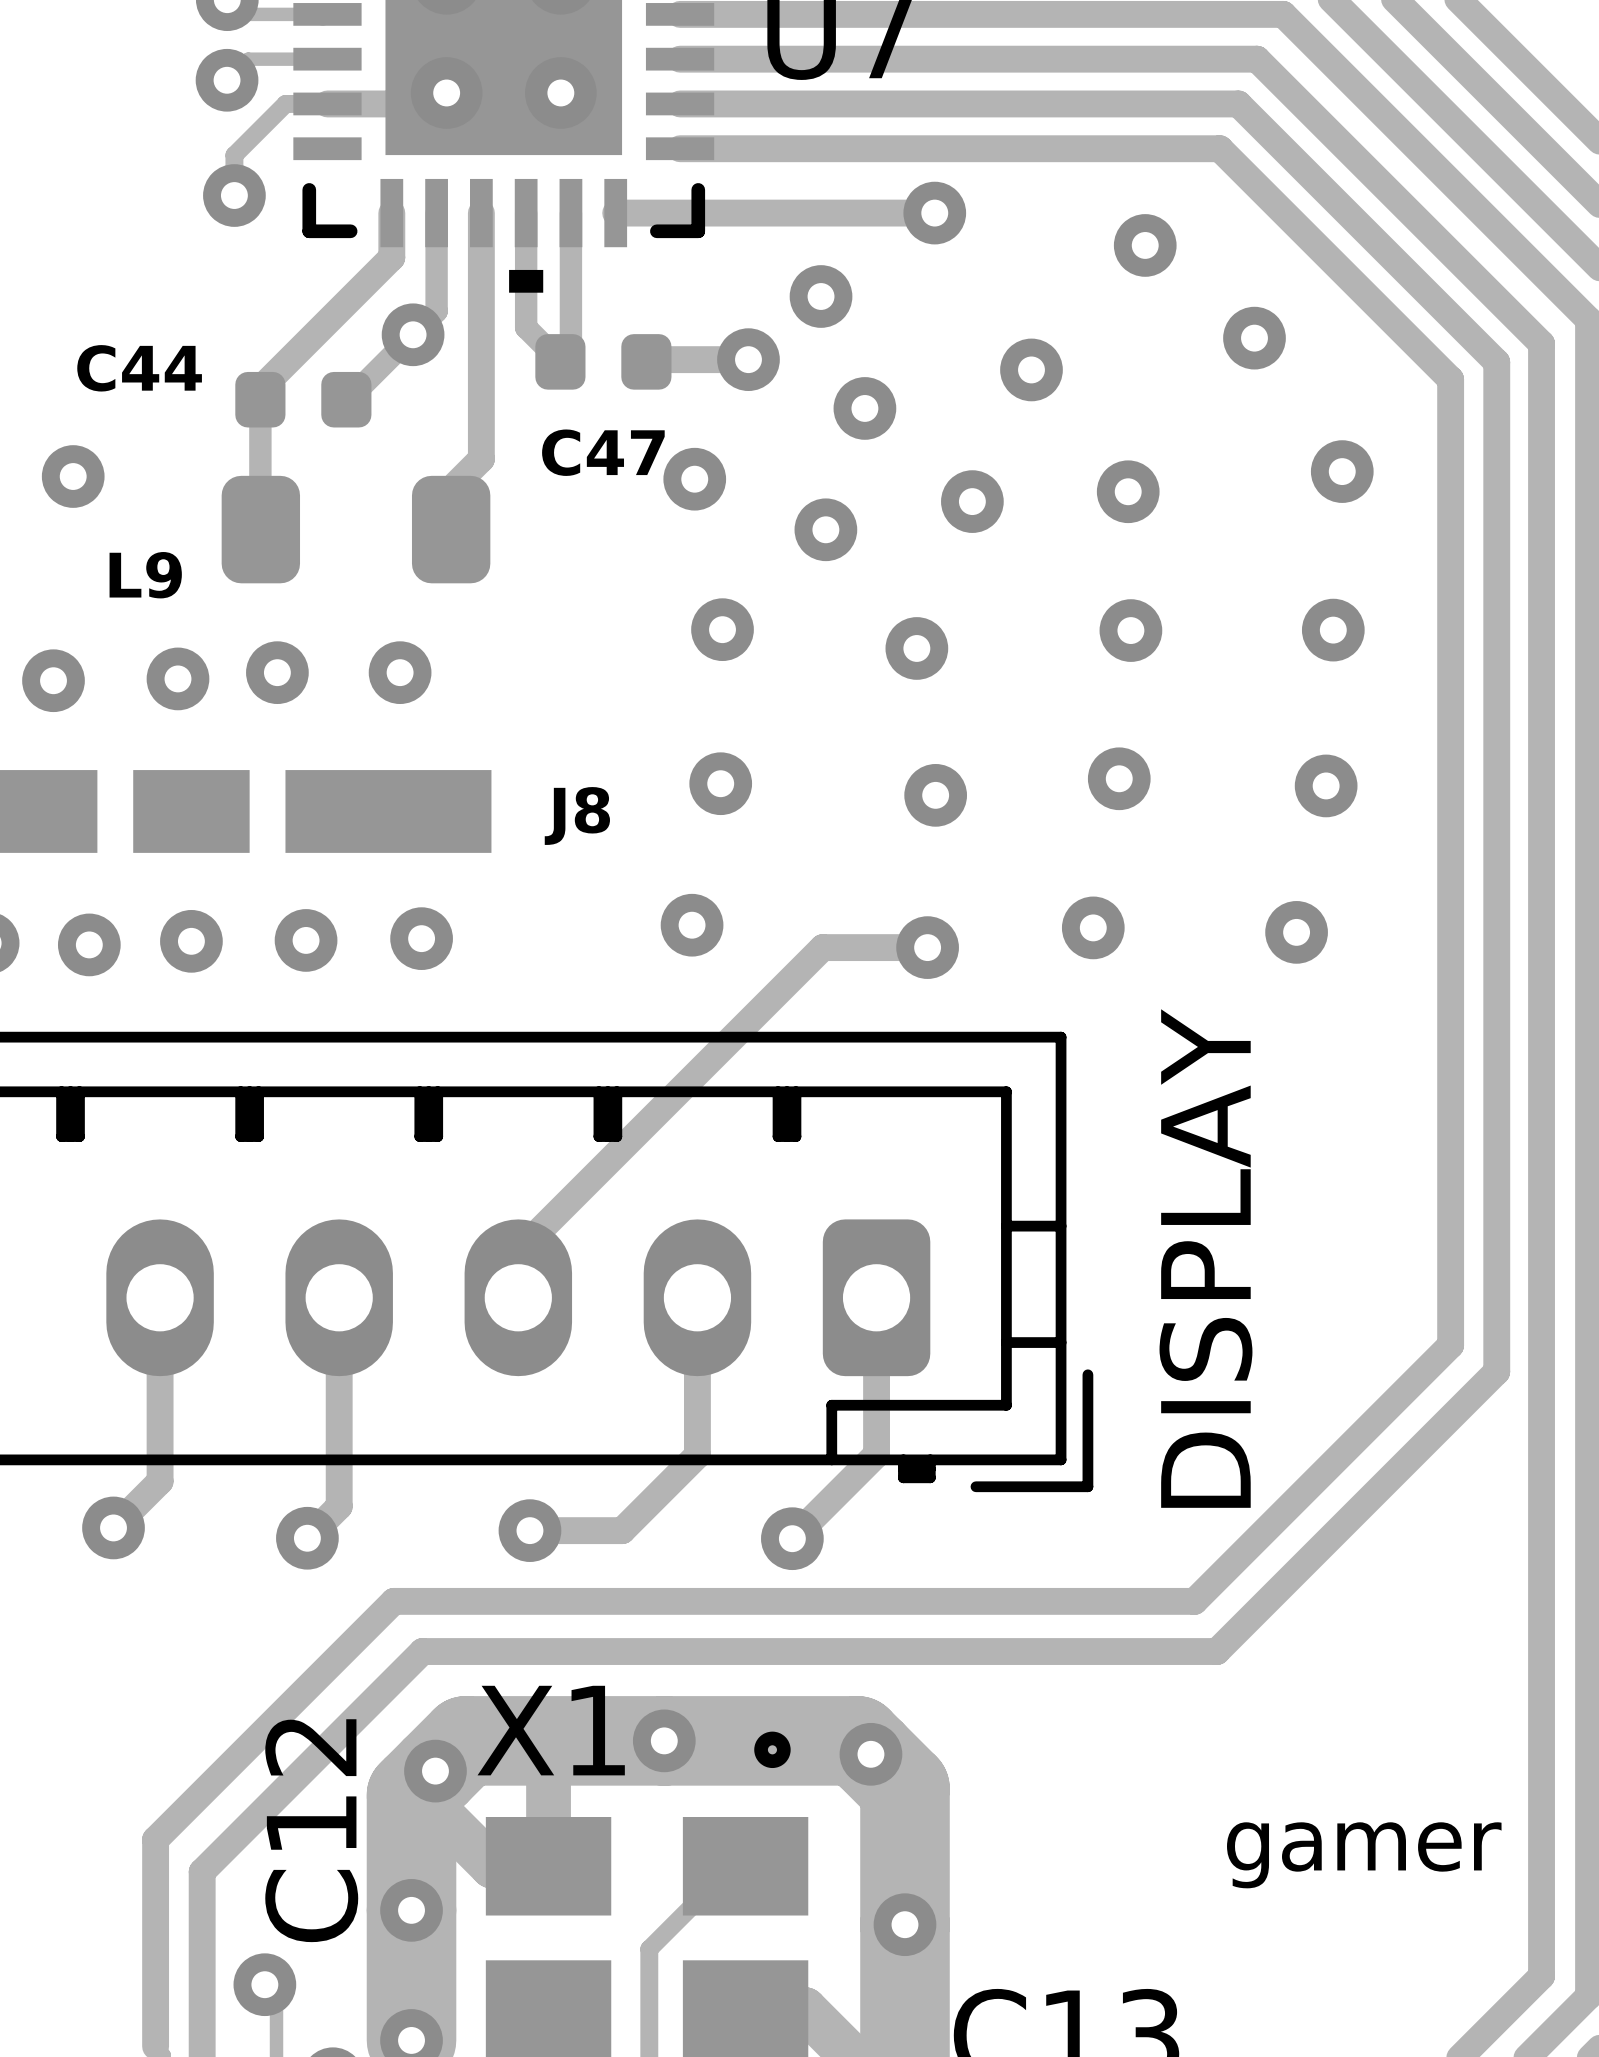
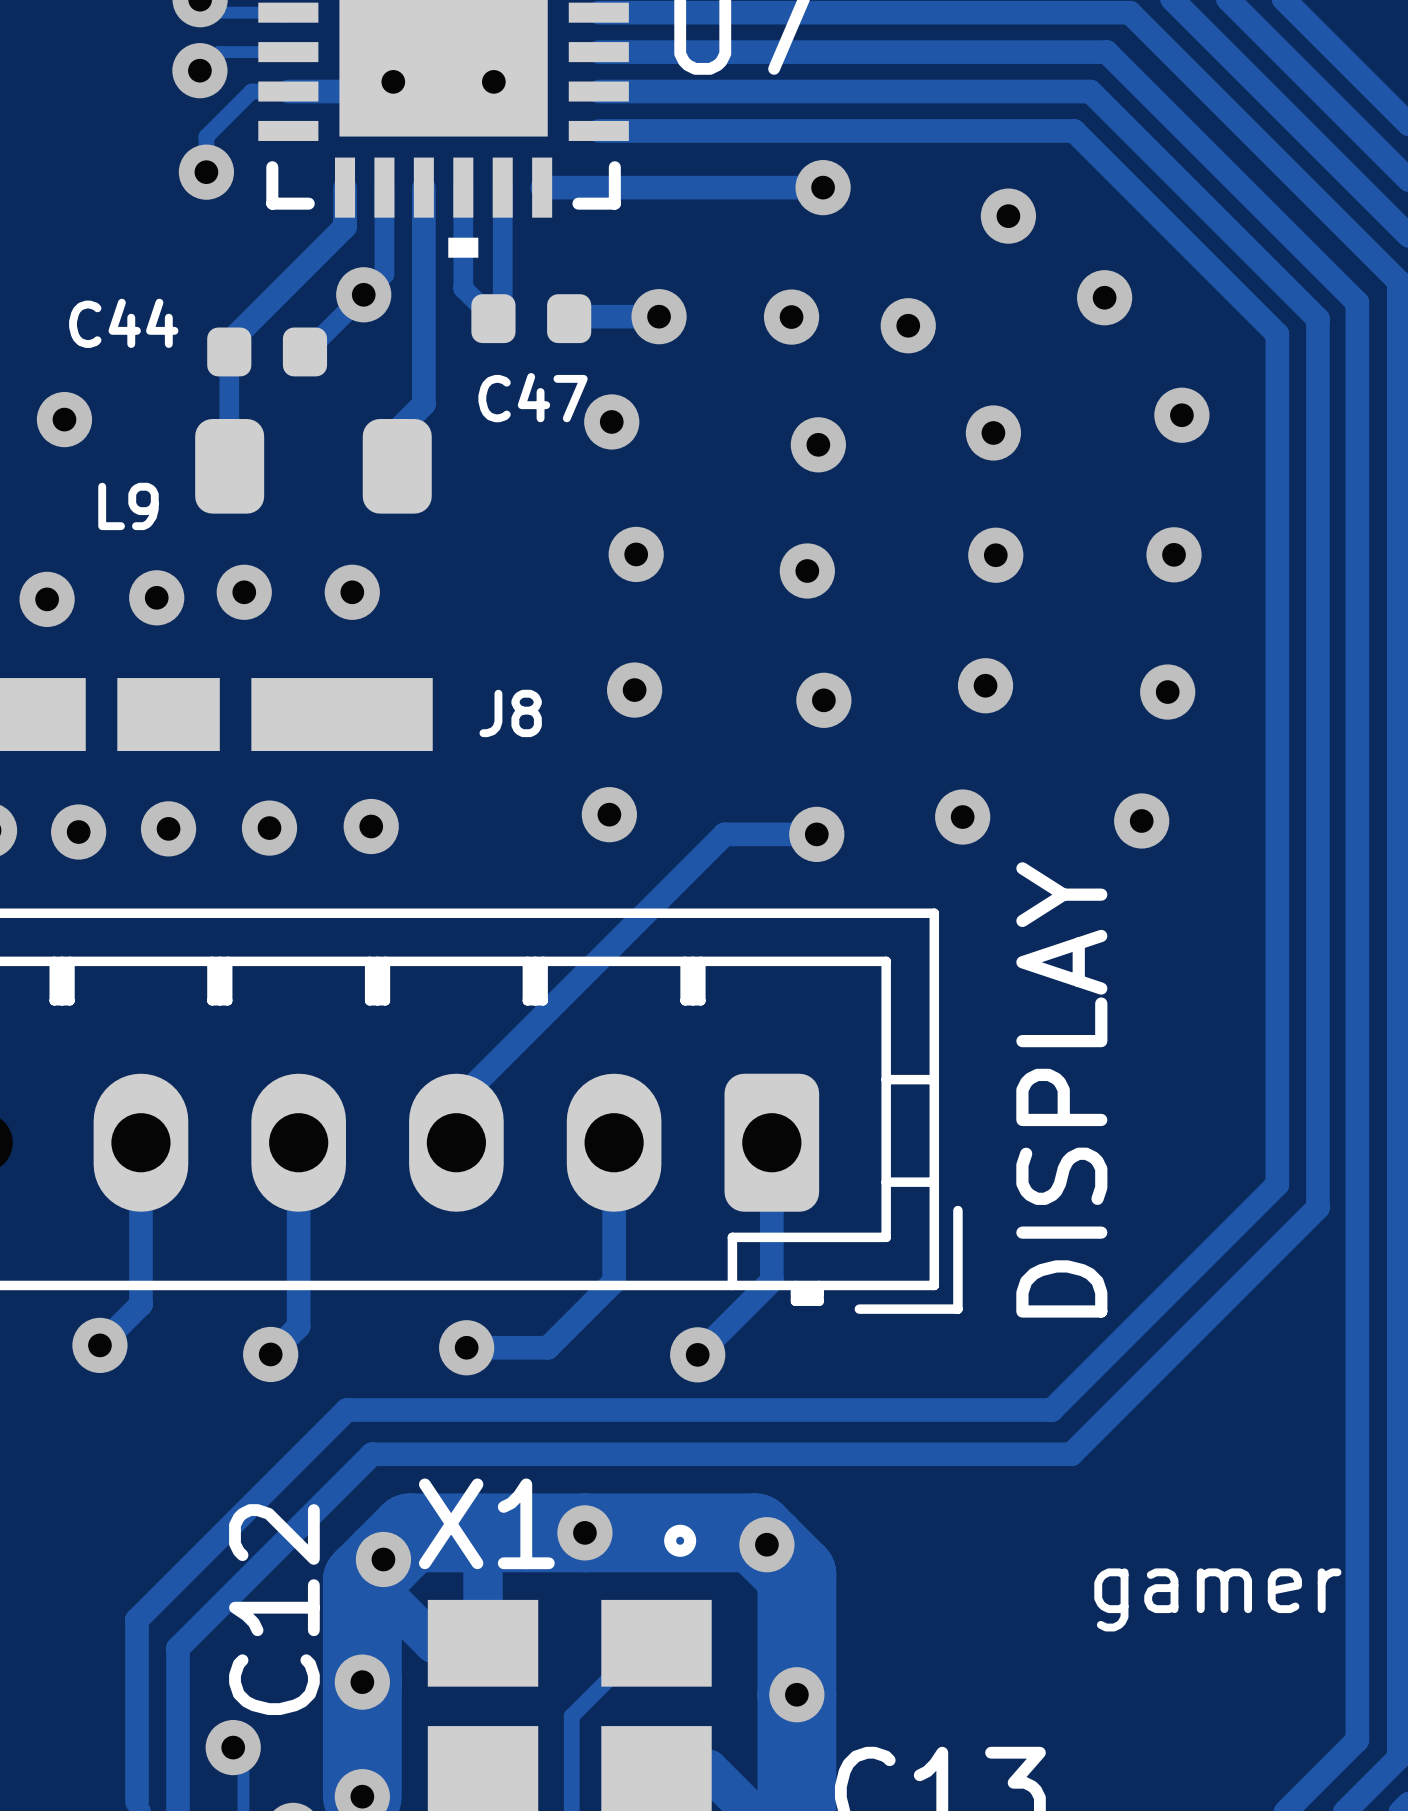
via: (821, 296) -> none
via position: (864, 408) -> (791, 317)
via position: (972, 501) -> (818, 444)
via: (825, 529) -> none
text position: gamer (1364, 1855) -> gamer (1217, 1599)

